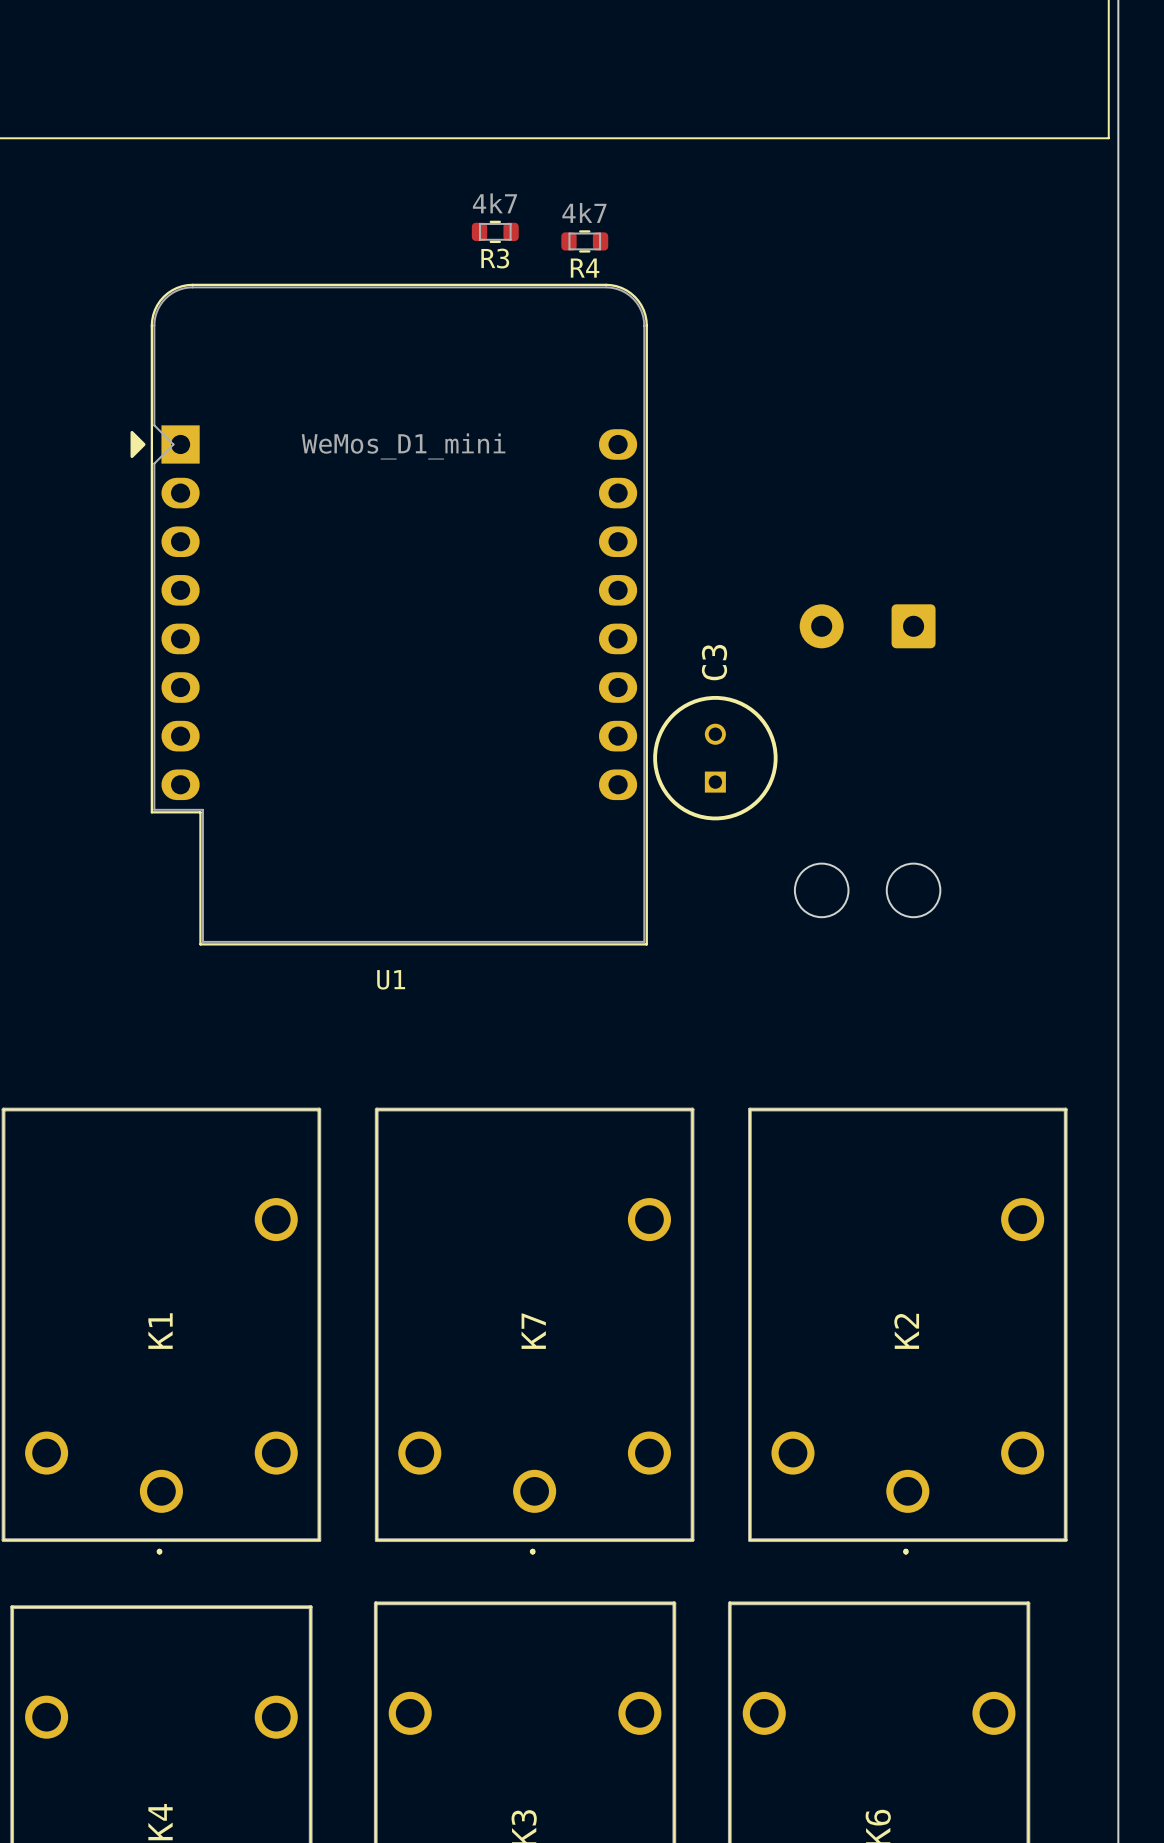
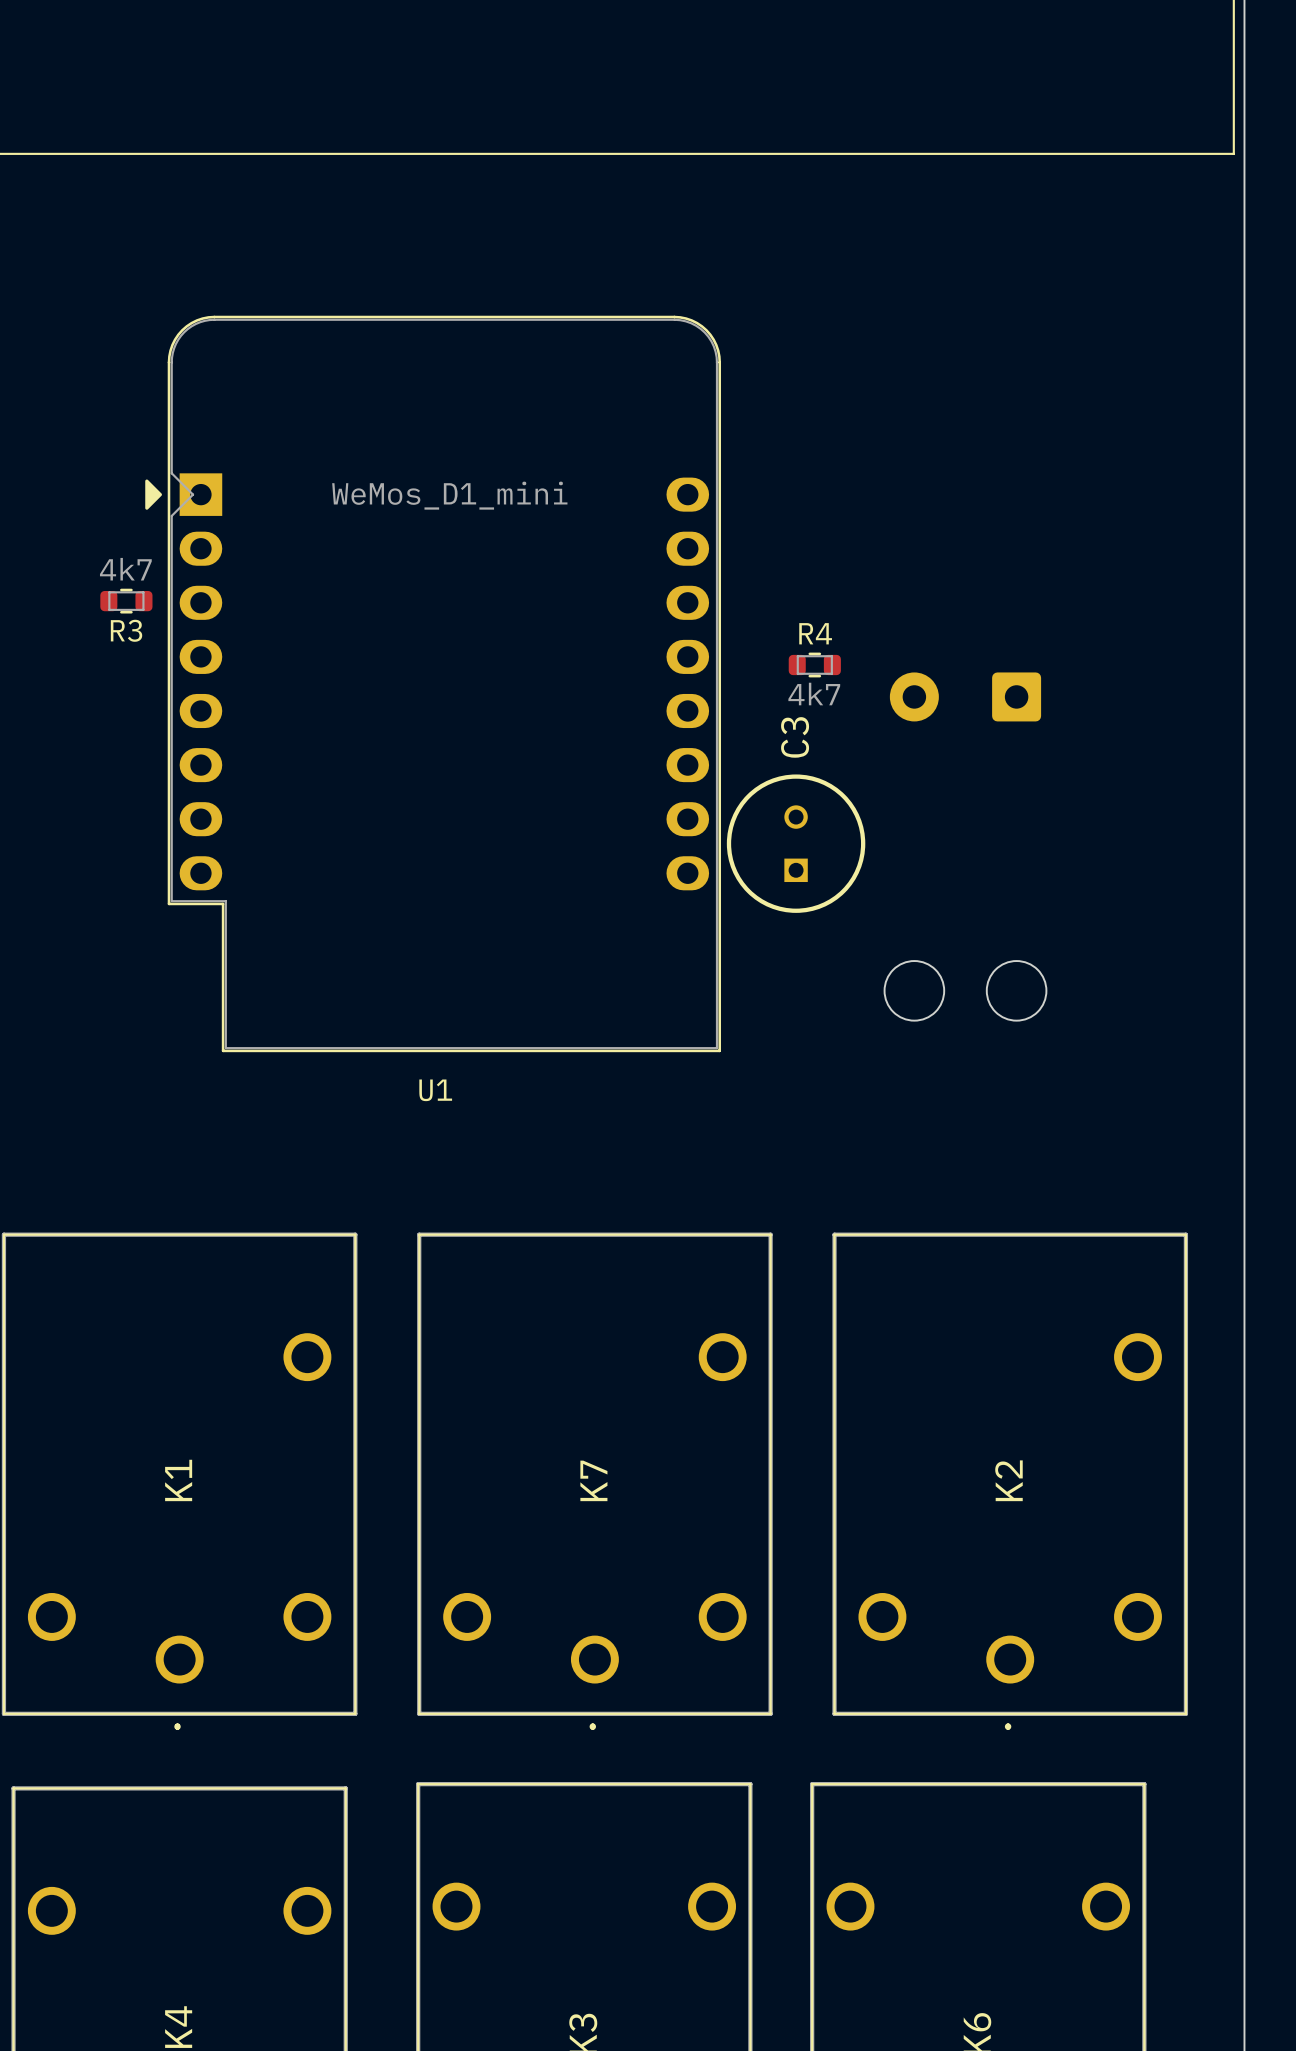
R4 value position: 4k7 (584, 212) -> 4k7 (814, 694)
R3 position: (495, 231) -> (126, 601)
R4 position: (584, 241) -> (814, 665)
R4 name position: R4 (585, 268) -> R4 (815, 633)

